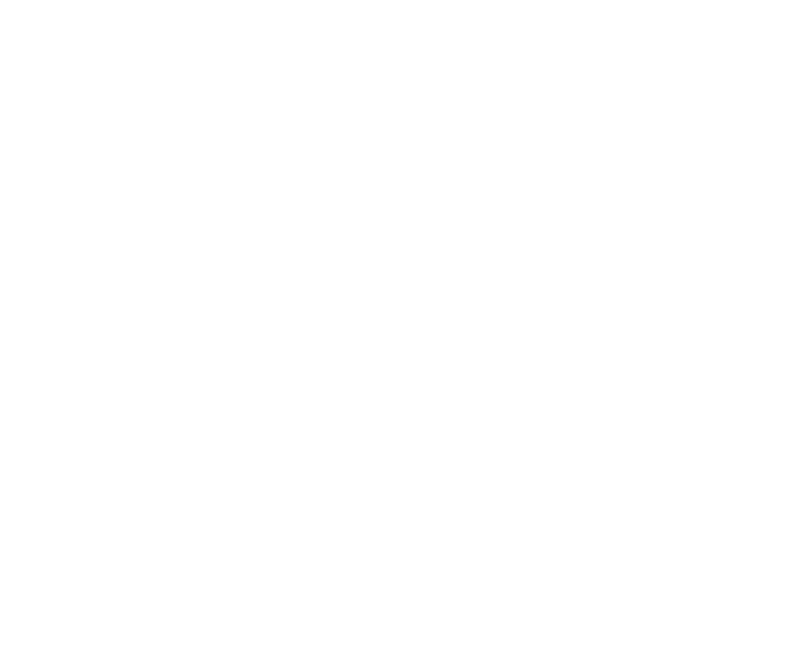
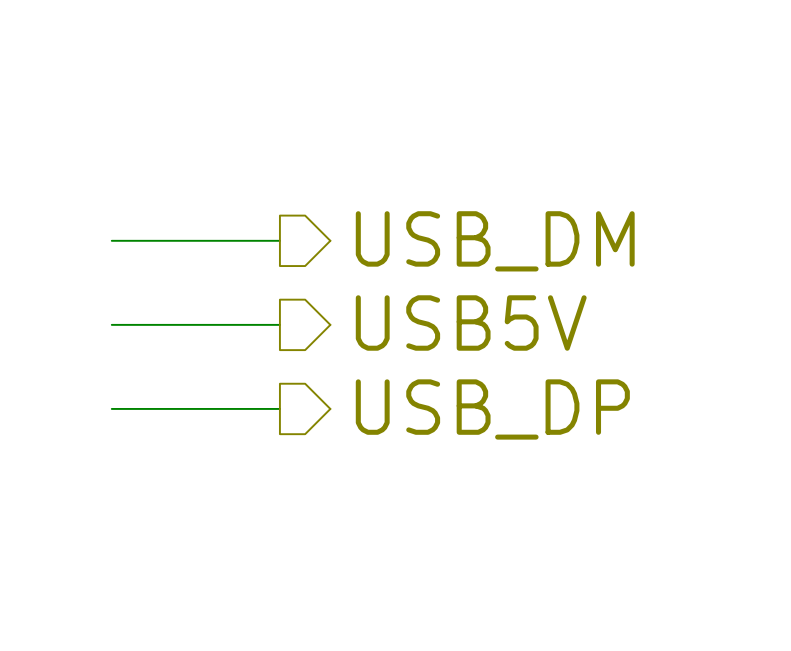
wire: none -> (111, 240) (279, 240)
hierarchical label: none -> USB_DM (495, 241)
hierarchical label: none -> USB5V (471, 323)
wire: none -> (111, 324) (279, 324)
wire: none -> (111, 408) (279, 408)
hierarchical label: none -> USB_DP (492, 409)

